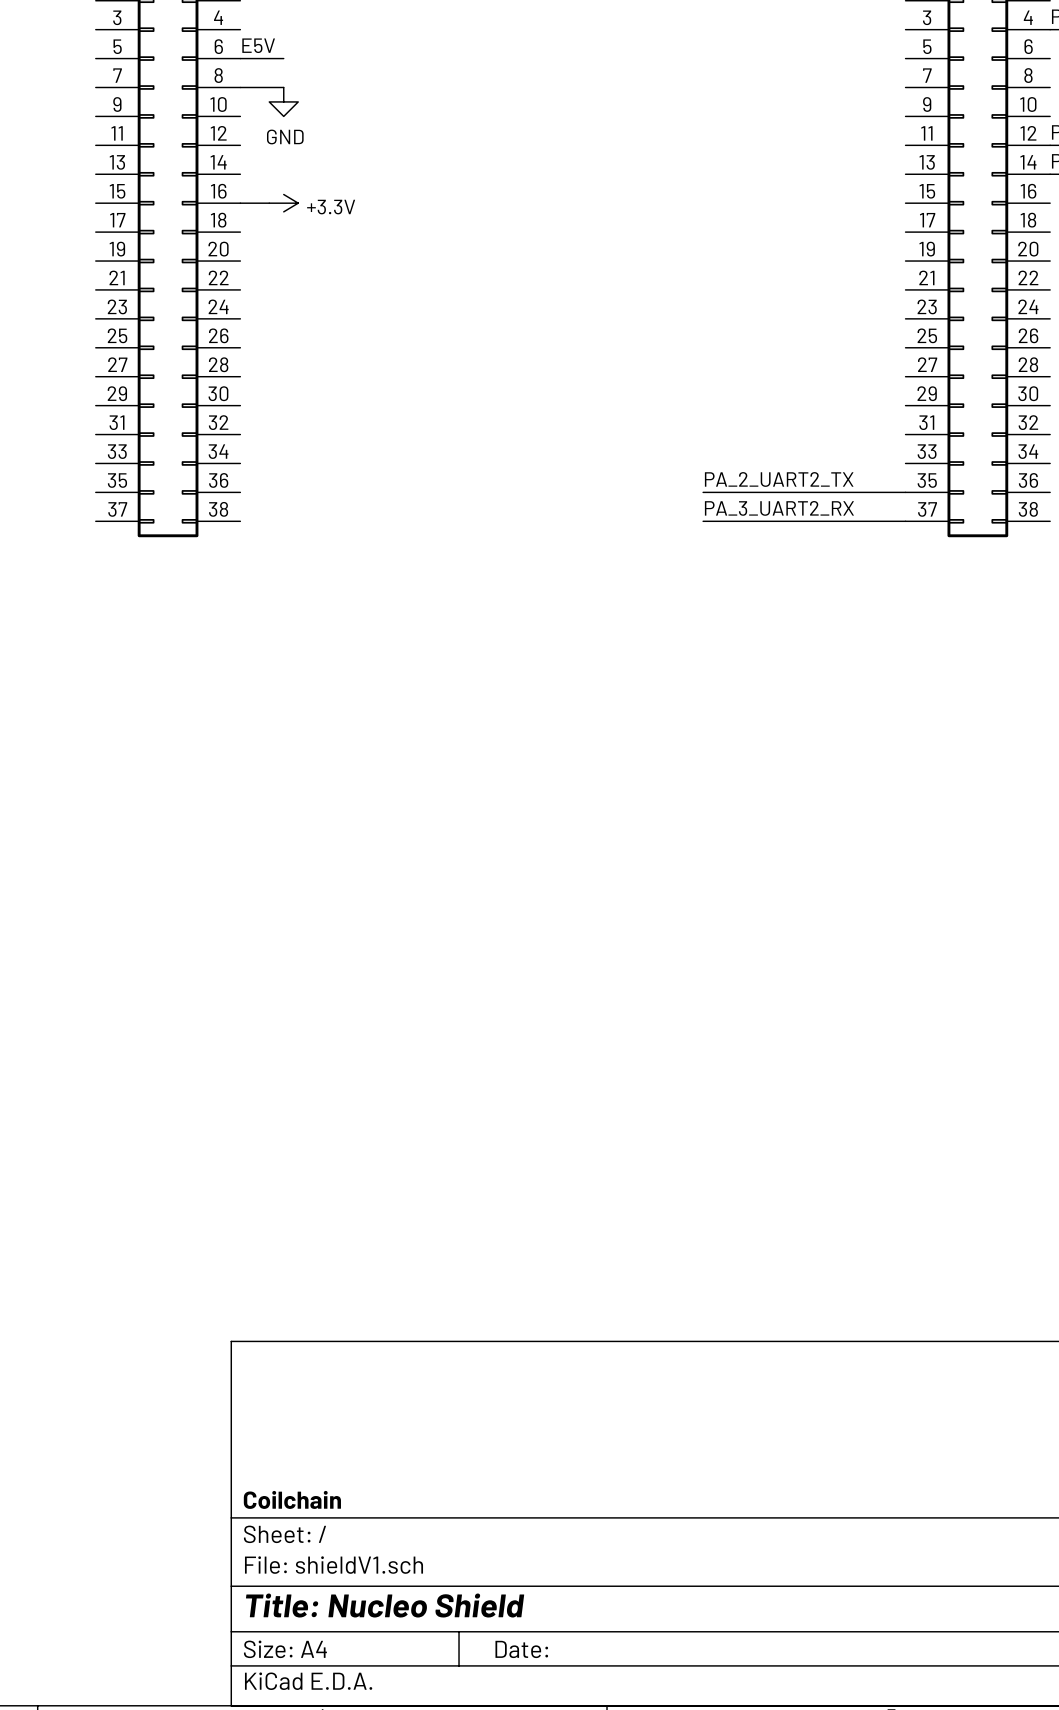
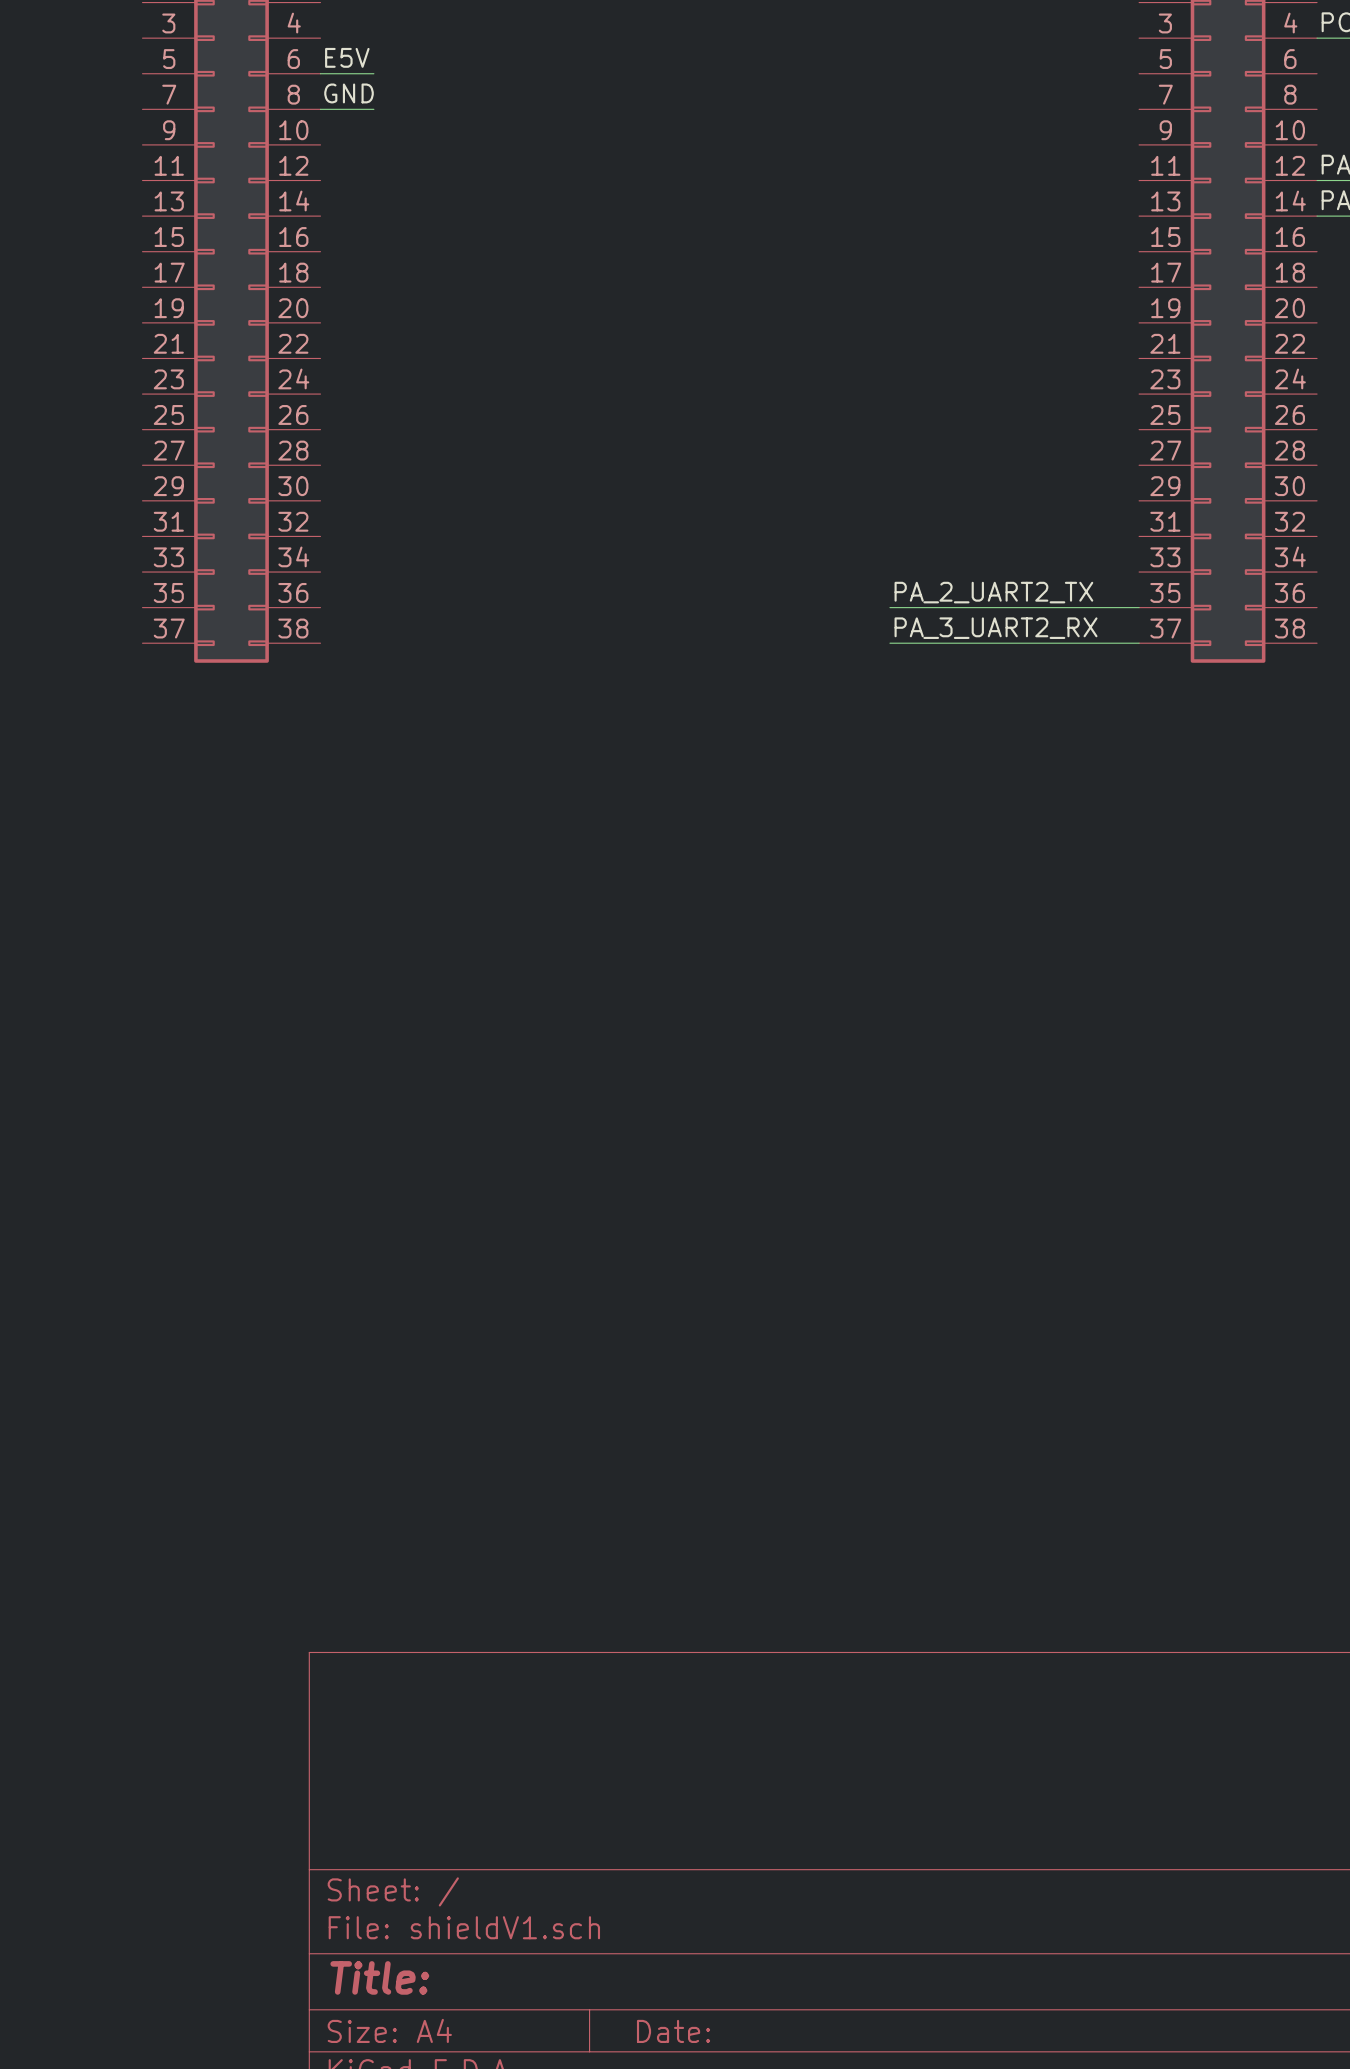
label: none -> GND (349, 93)
power symbol: GND (283, 101) -> none
wire: (240, 203) (269, 203) -> none
power symbol: +3.3V (283, 203) -> none
title block: Coilchain (292, 1499) -> none
title block: Title: Nucleo Shield (385, 1605) -> Title: (379, 1977)

